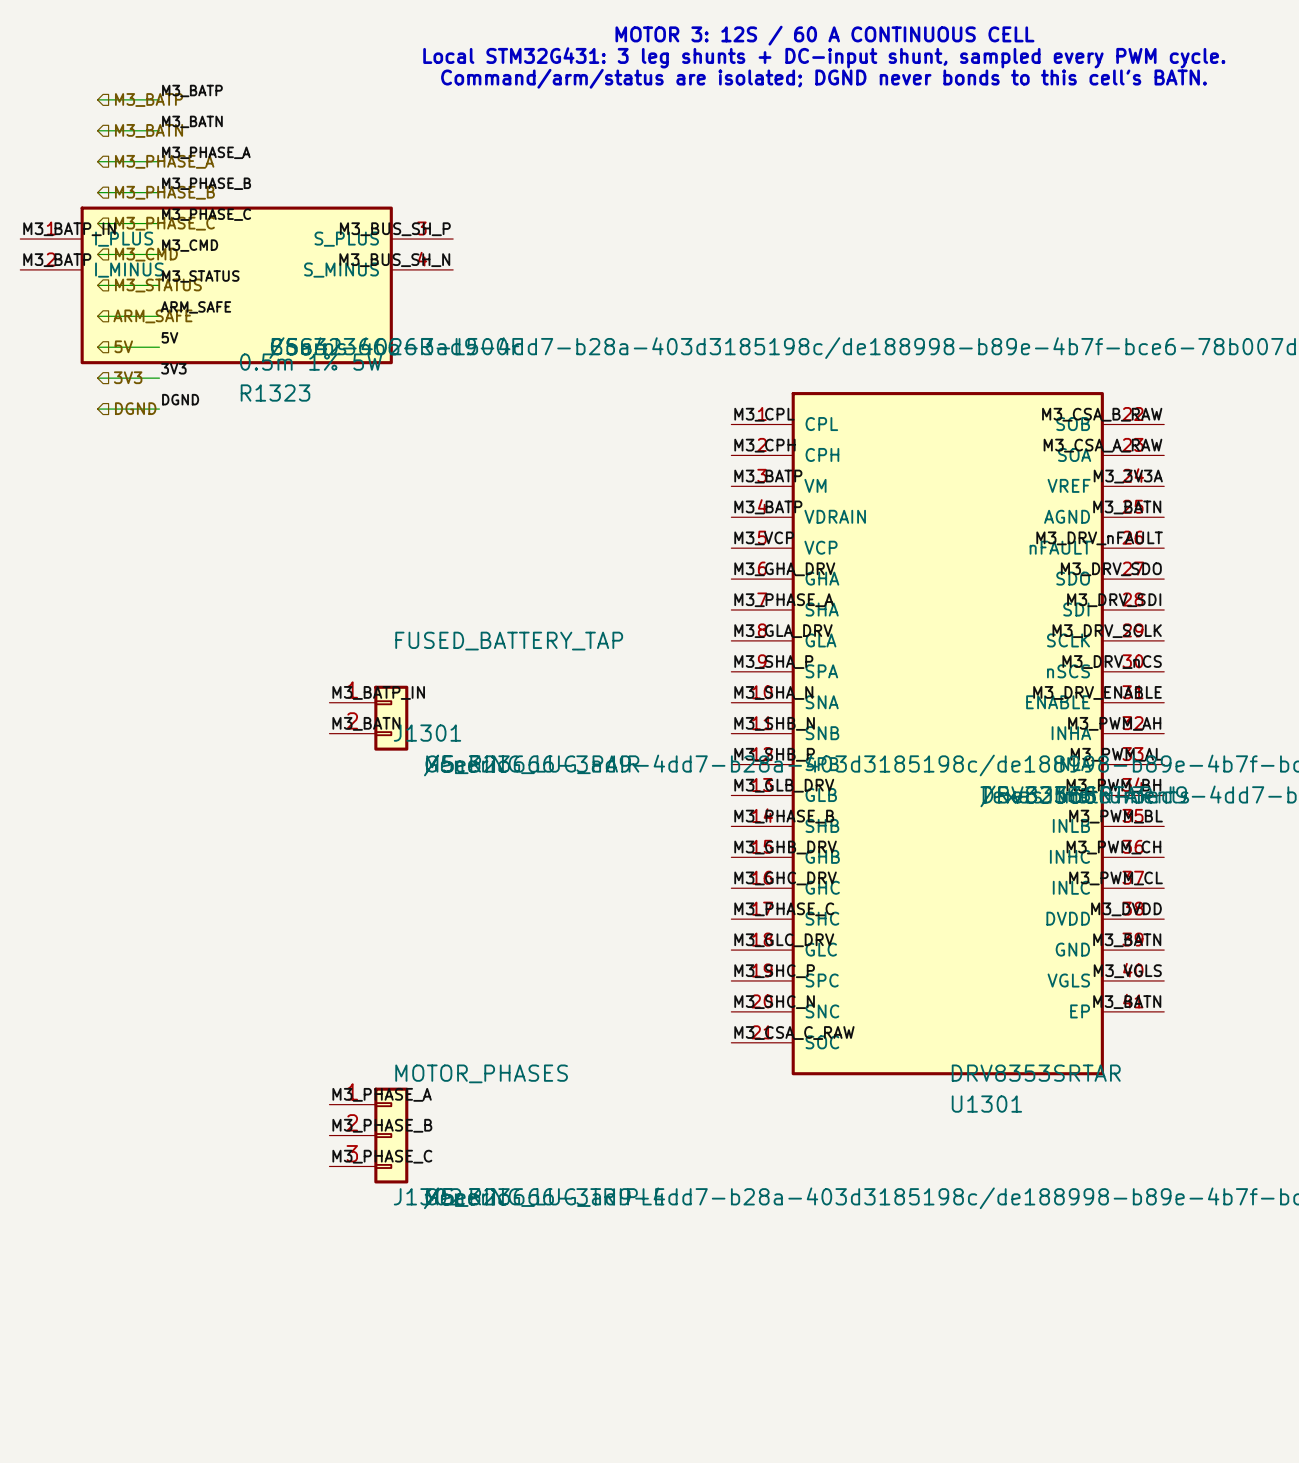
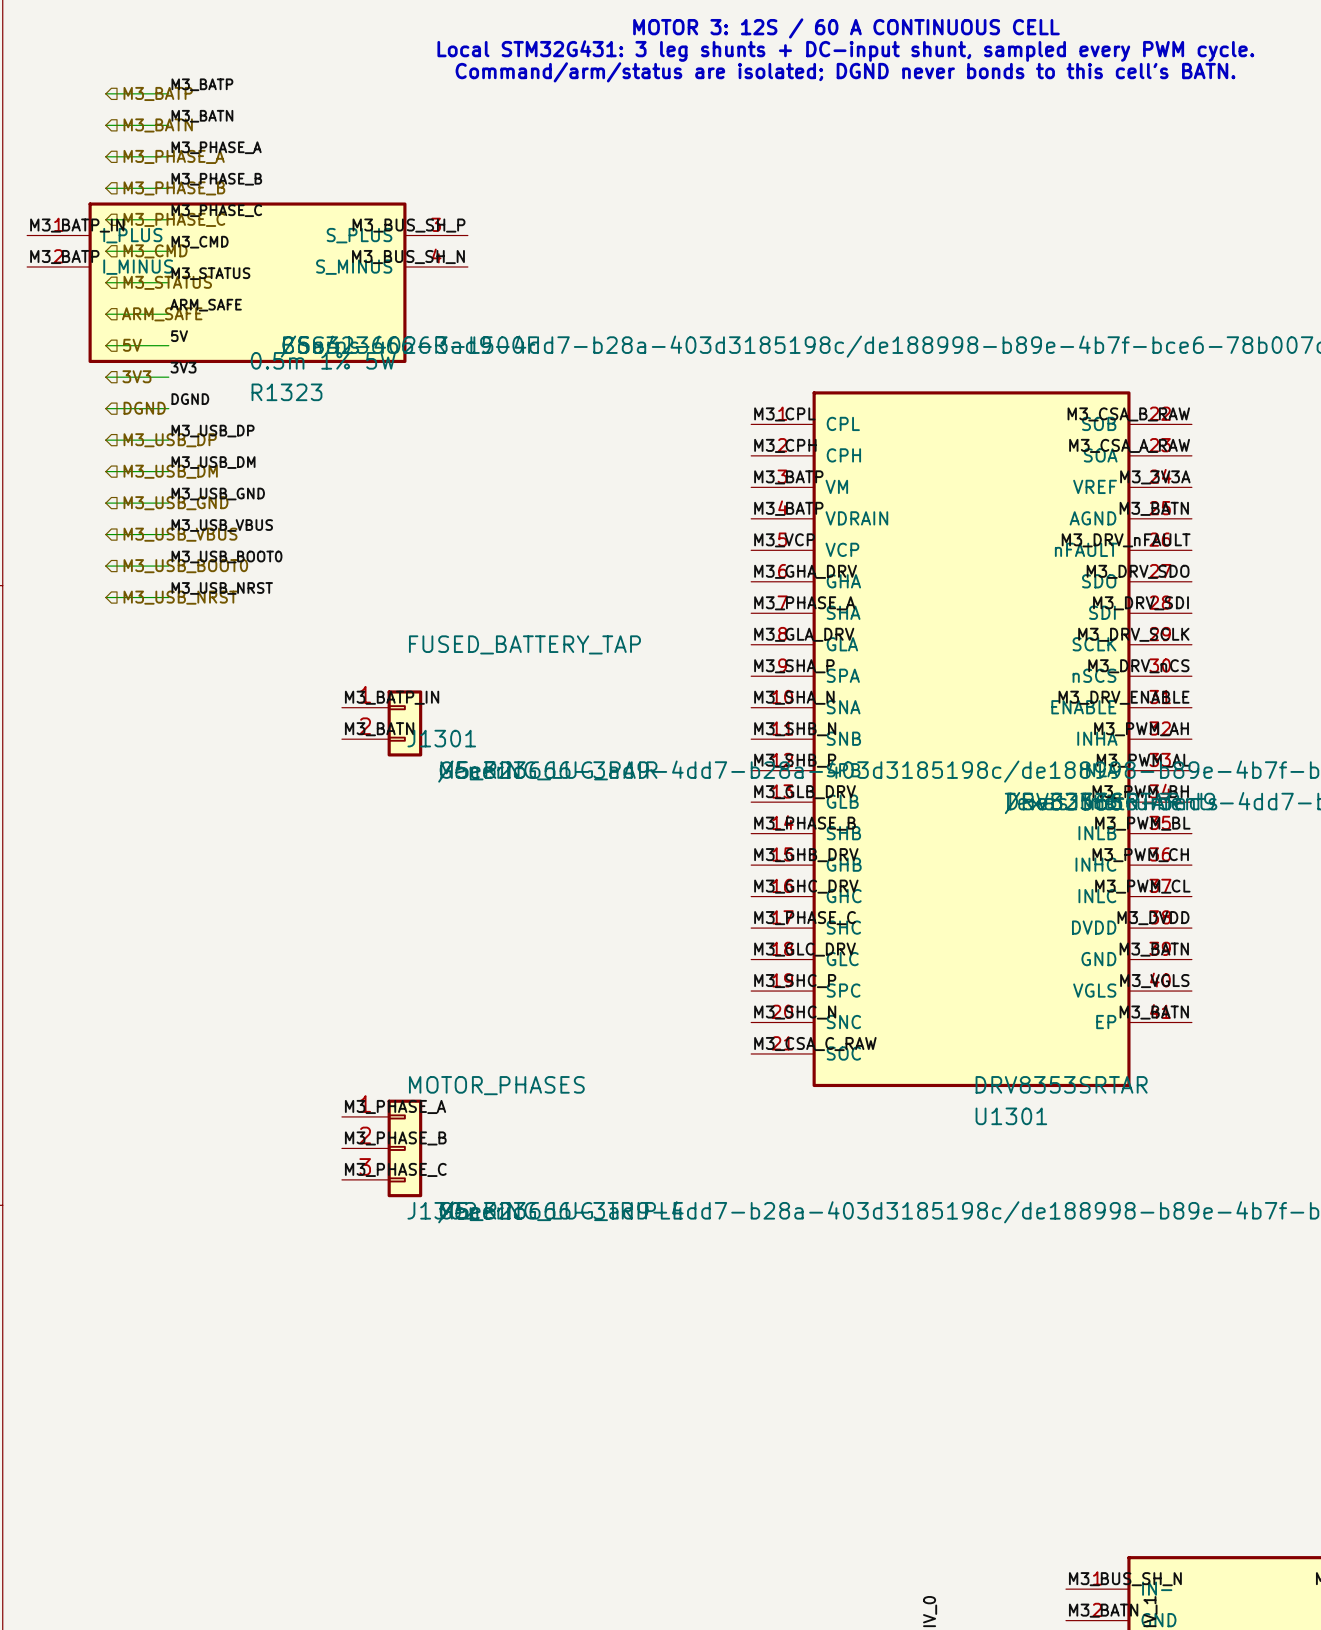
label: none -> M3_USB_DP (213, 431)
wire: none -> (105, 440) (168, 440)
hierarchical label: none -> M3_USB_DP (170, 440)
label: none -> M3_USB_DM (213, 462)
wire: none -> (105, 471) (168, 471)
hierarchical label: none -> M3_USB_DM (170, 471)
label: none -> M3_USB_GND (218, 494)
wire: none -> (105, 503) (168, 503)
hierarchical label: none -> M3_USB_GND (175, 503)
label: none -> M3_USB_VBUS (222, 525)
wire: none -> (105, 534) (168, 534)
hierarchical label: none -> M3_USB_VBUS (180, 534)
label: none -> M3_USB_BOOT0 (226, 556)
wire: none -> (105, 566) (168, 566)
hierarchical label: none -> M3_USB_BOOT0 (185, 566)
label: none -> M3_USB_NRST (222, 588)
wire: none -> (105, 597) (168, 597)
hierarchical label: none -> M3_USB_NRST (180, 597)

